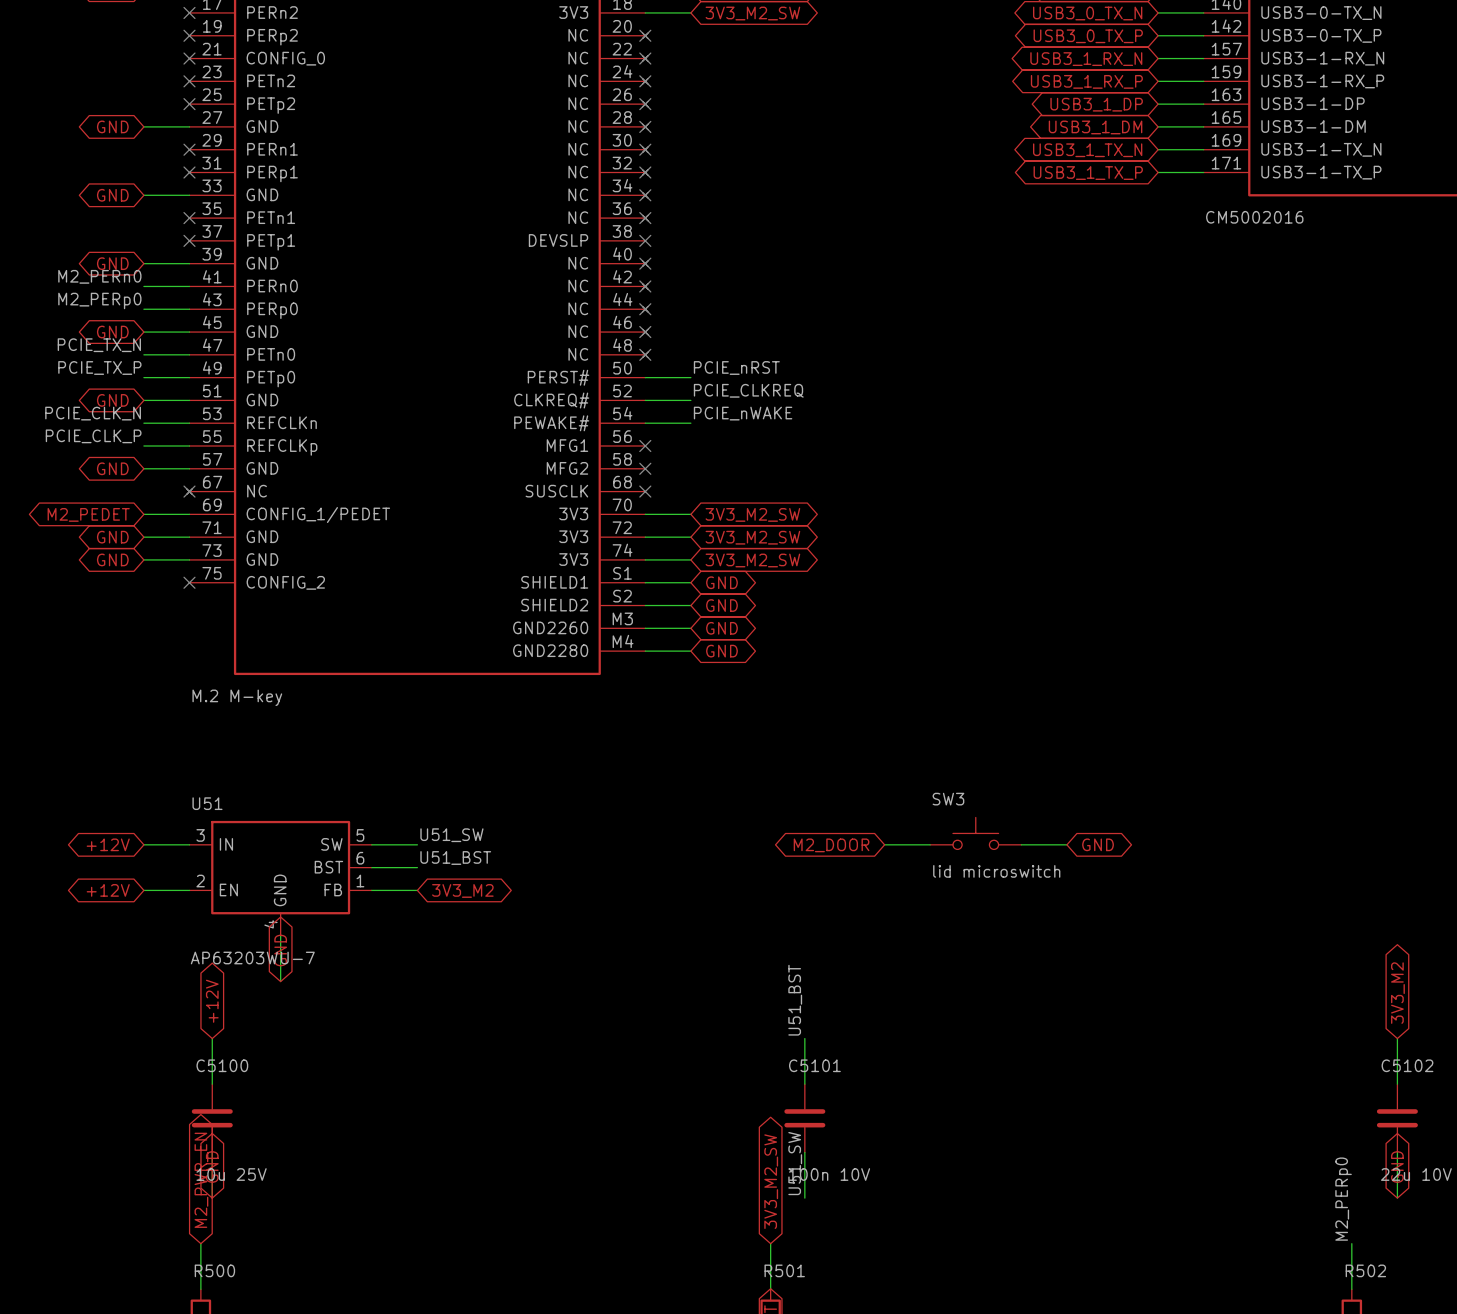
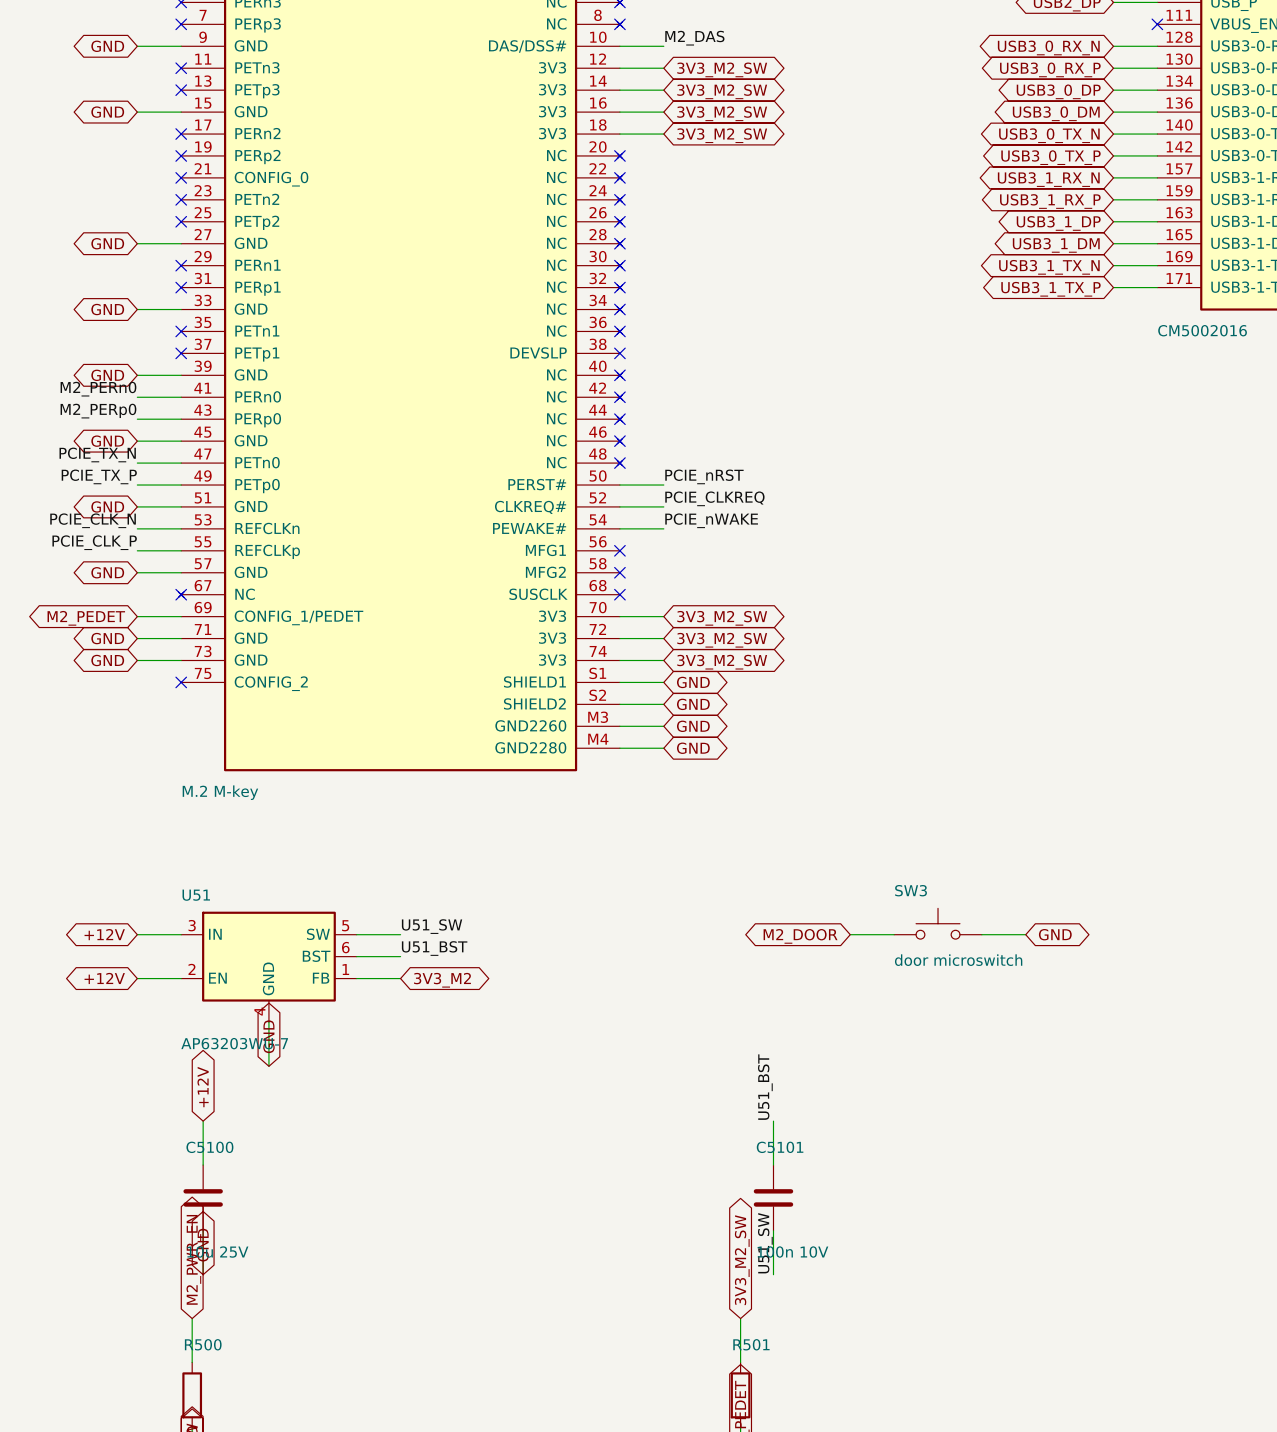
SW3 value: lid microswitch (996, 871) -> door microswitch (958, 960)

